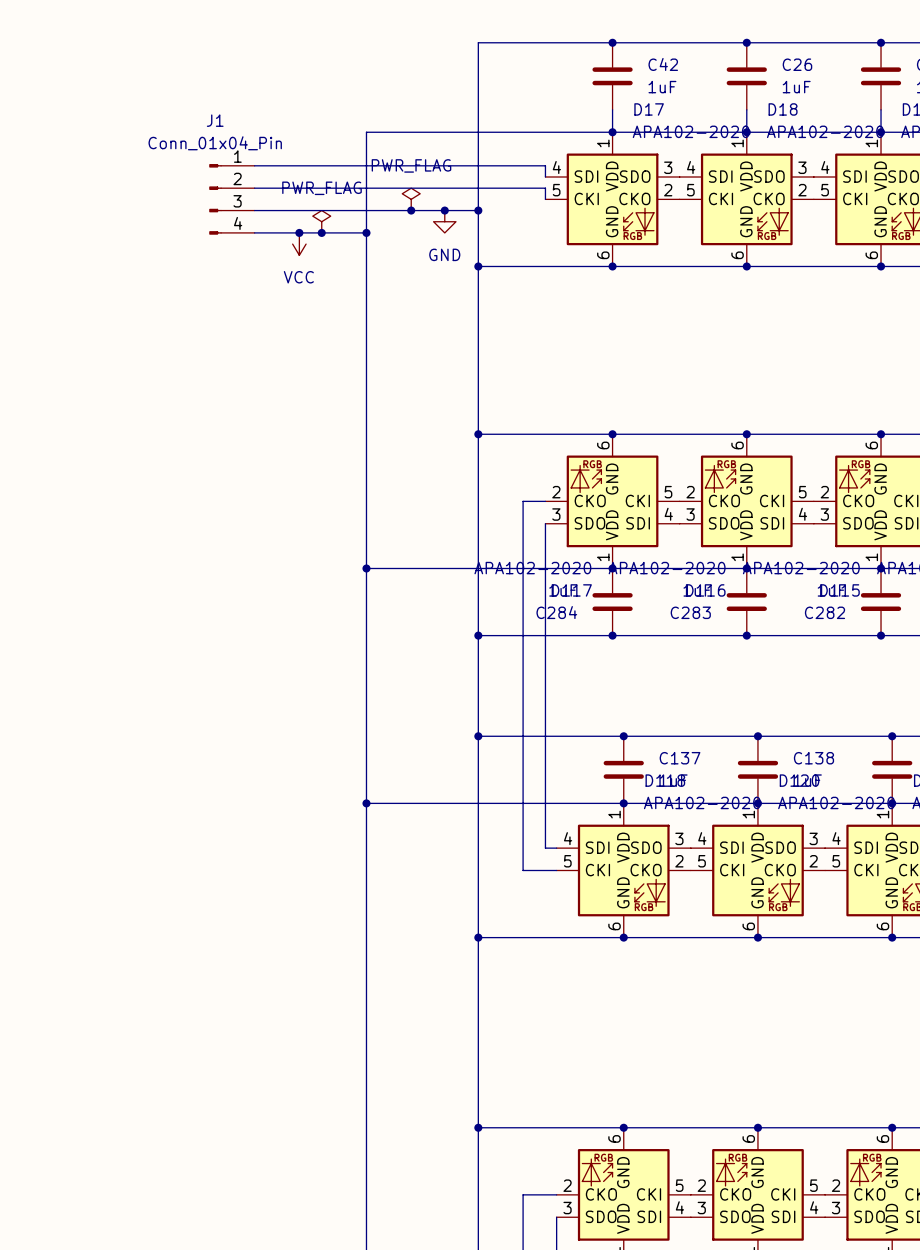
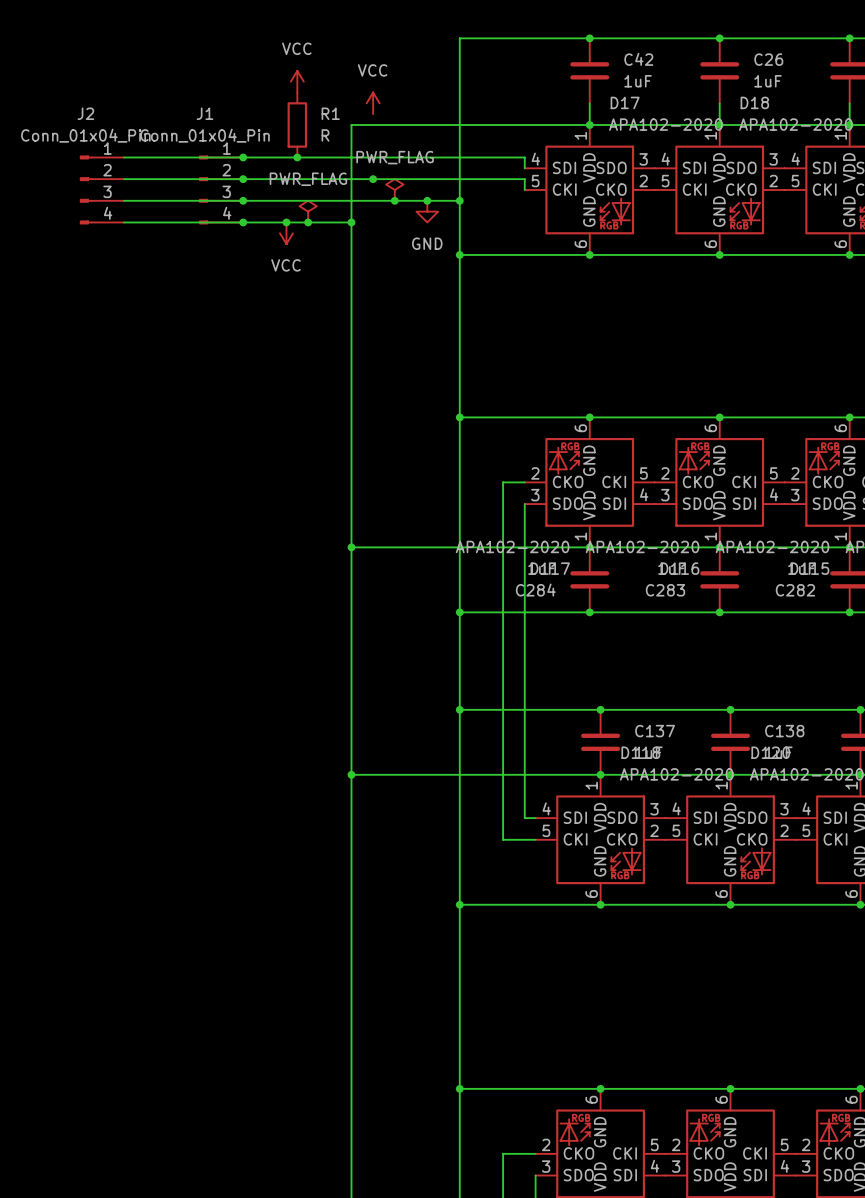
power symbol: none -> VCC (297, 81)
power symbol: none -> VCC (373, 103)
R1: none -> R (297, 125)
wire: none -> (124, 157) (243, 157)
junction: none -> (243, 157)
junction: none -> (297, 157)
wire: none -> (124, 179) (243, 179)
junction: none -> (243, 179)
junction: none -> (373, 179)
J2: none -> Conn_01x04_Pin (102, 189)
wire: none -> (124, 200) (243, 200)
junction: none -> (243, 200)
wire: none -> (124, 222) (243, 222)
junction: none -> (243, 222)

